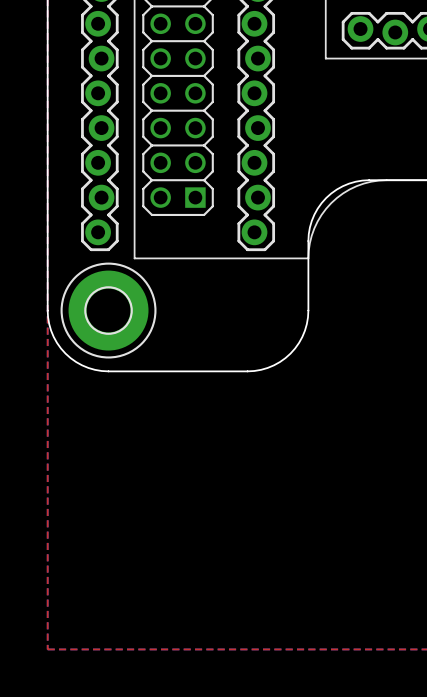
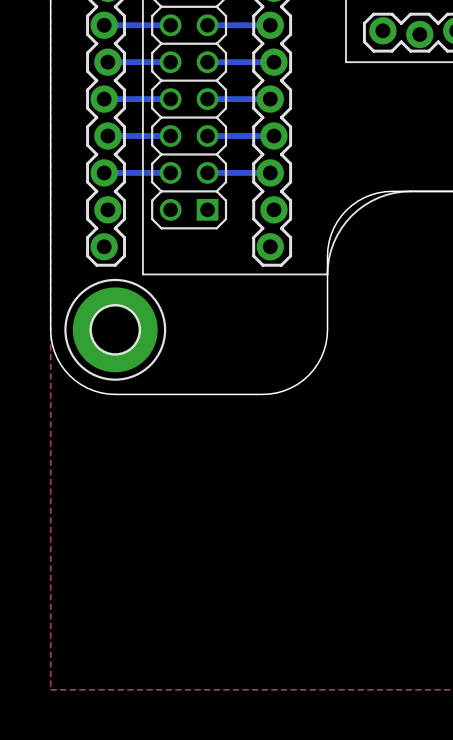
bottom track: none -> (104, 25) (170, 25)
bottom track: none -> (207, 25) (270, 25)
bottom track: none -> (107, 62) (170, 62)
bottom track: none -> (207, 62) (274, 62)
bottom track: none -> (104, 99) (170, 99)
bottom track: none -> (207, 99) (270, 99)
bottom track: none -> (107, 136) (170, 136)
bottom track: none -> (207, 136) (274, 136)
bottom track: none -> (104, 172) (170, 172)
bottom track: none -> (207, 172) (270, 172)

